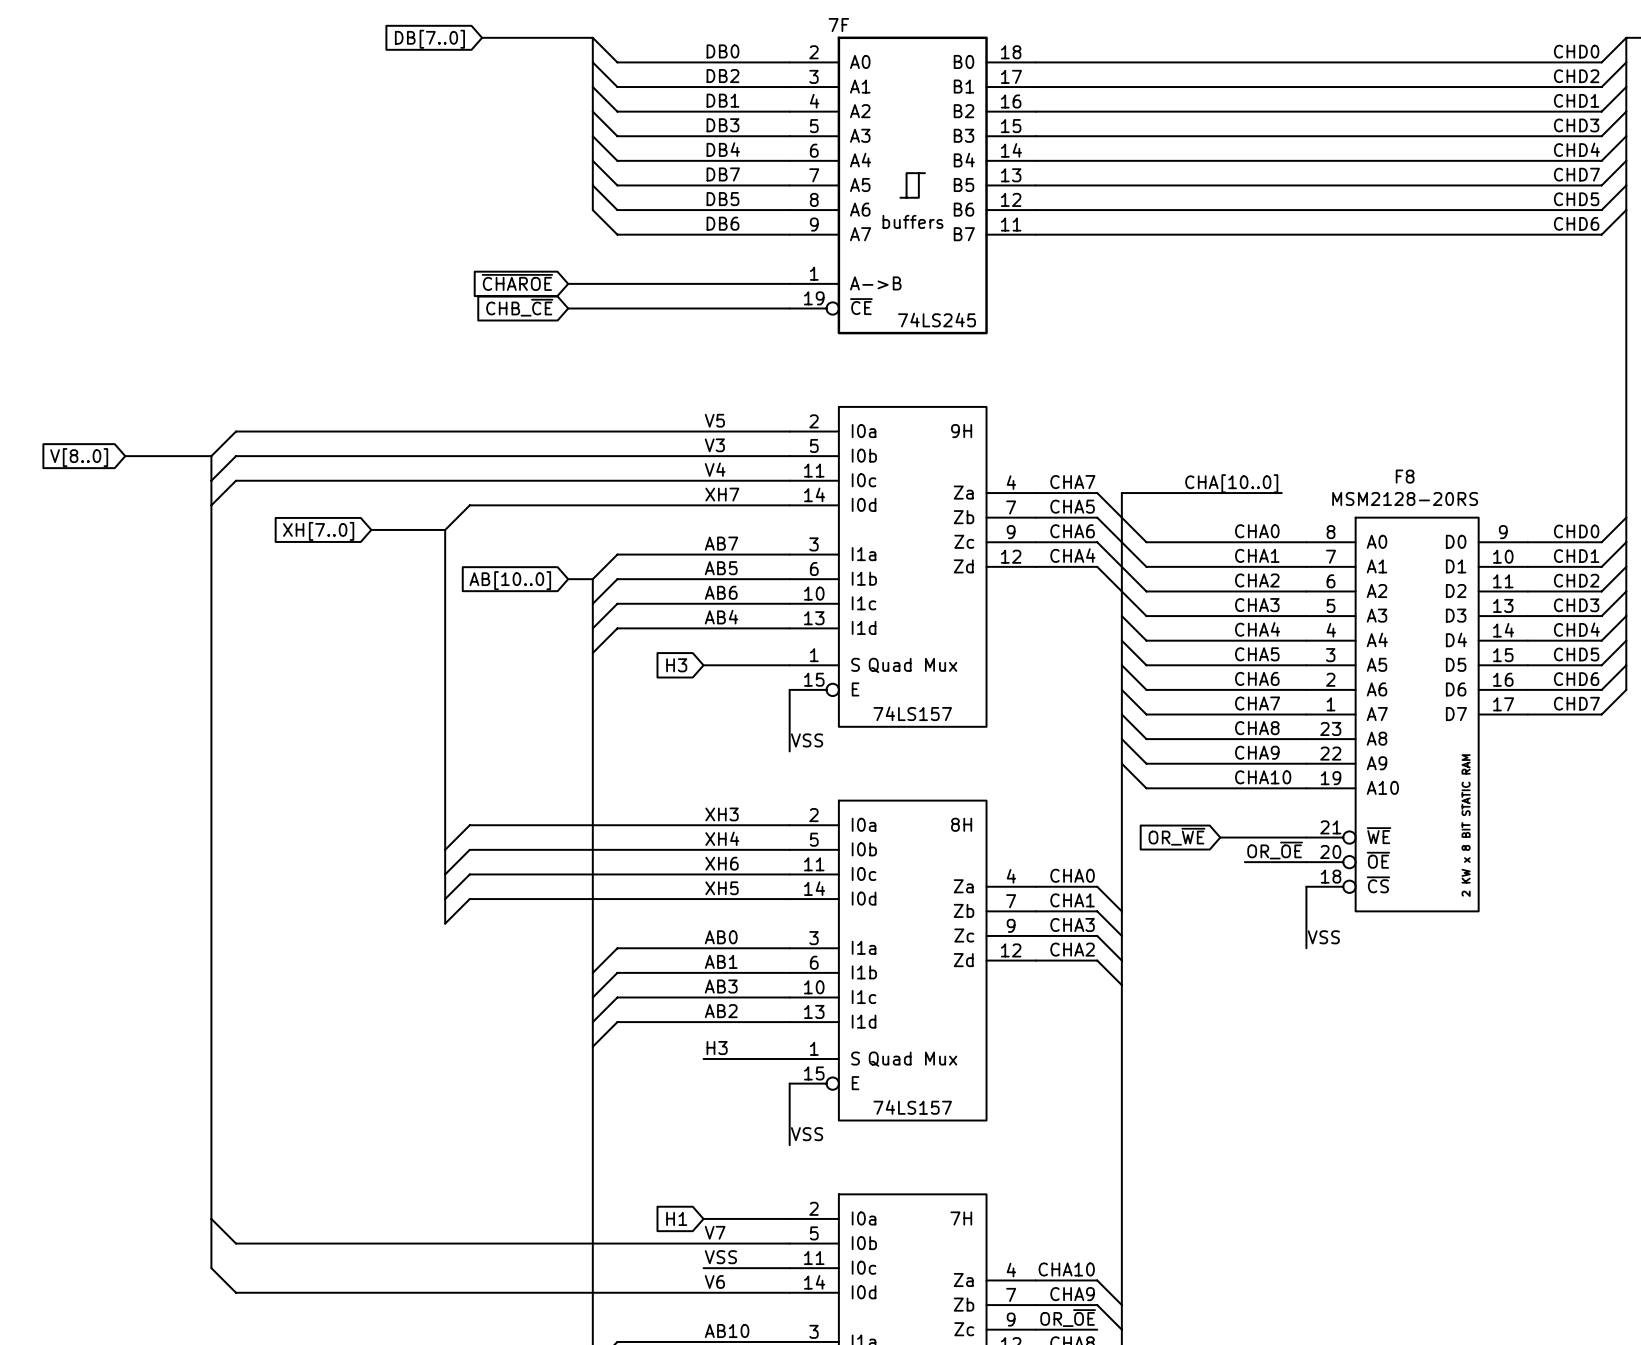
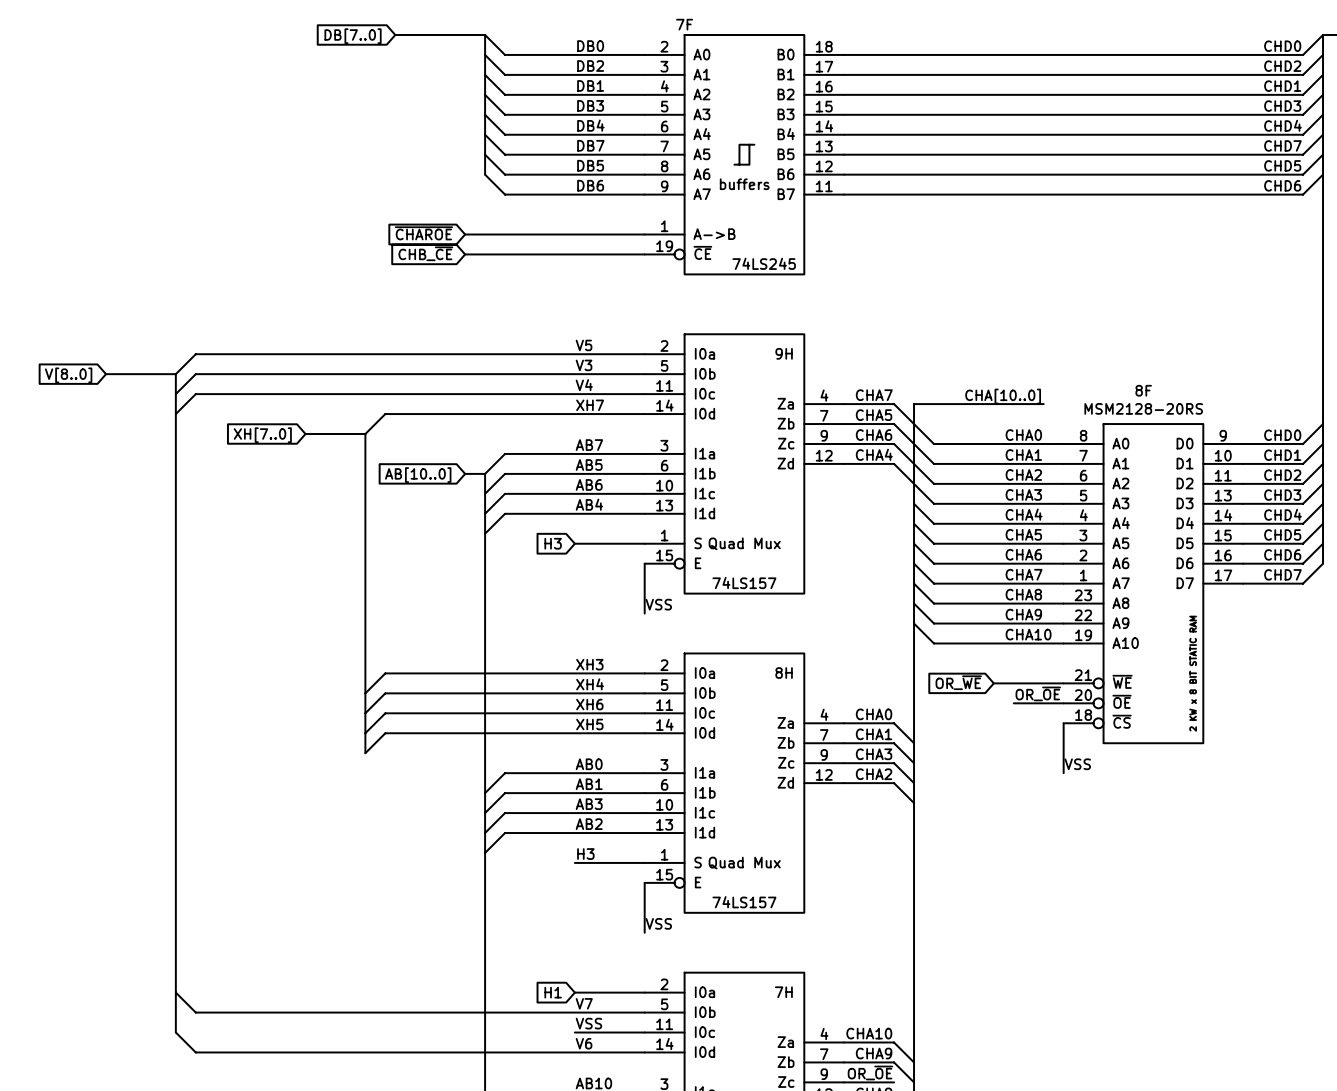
F8 name: F8 (1405, 476) -> 8F (1143, 390)

